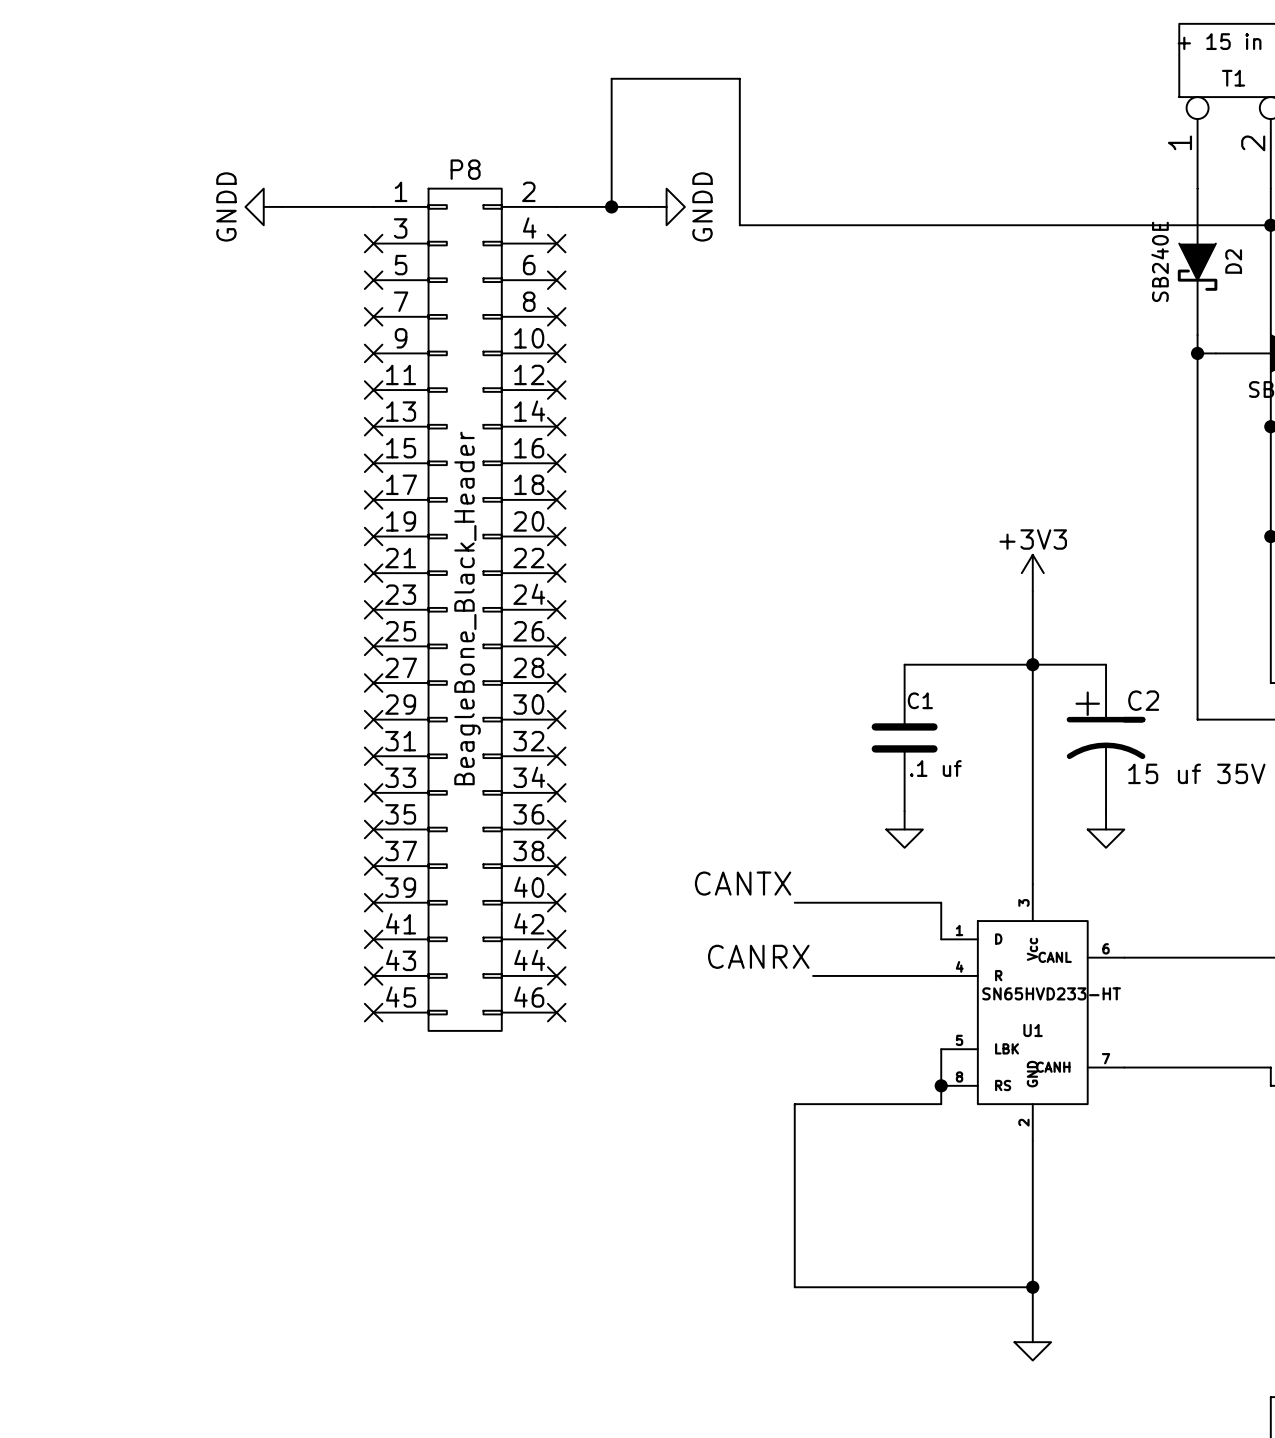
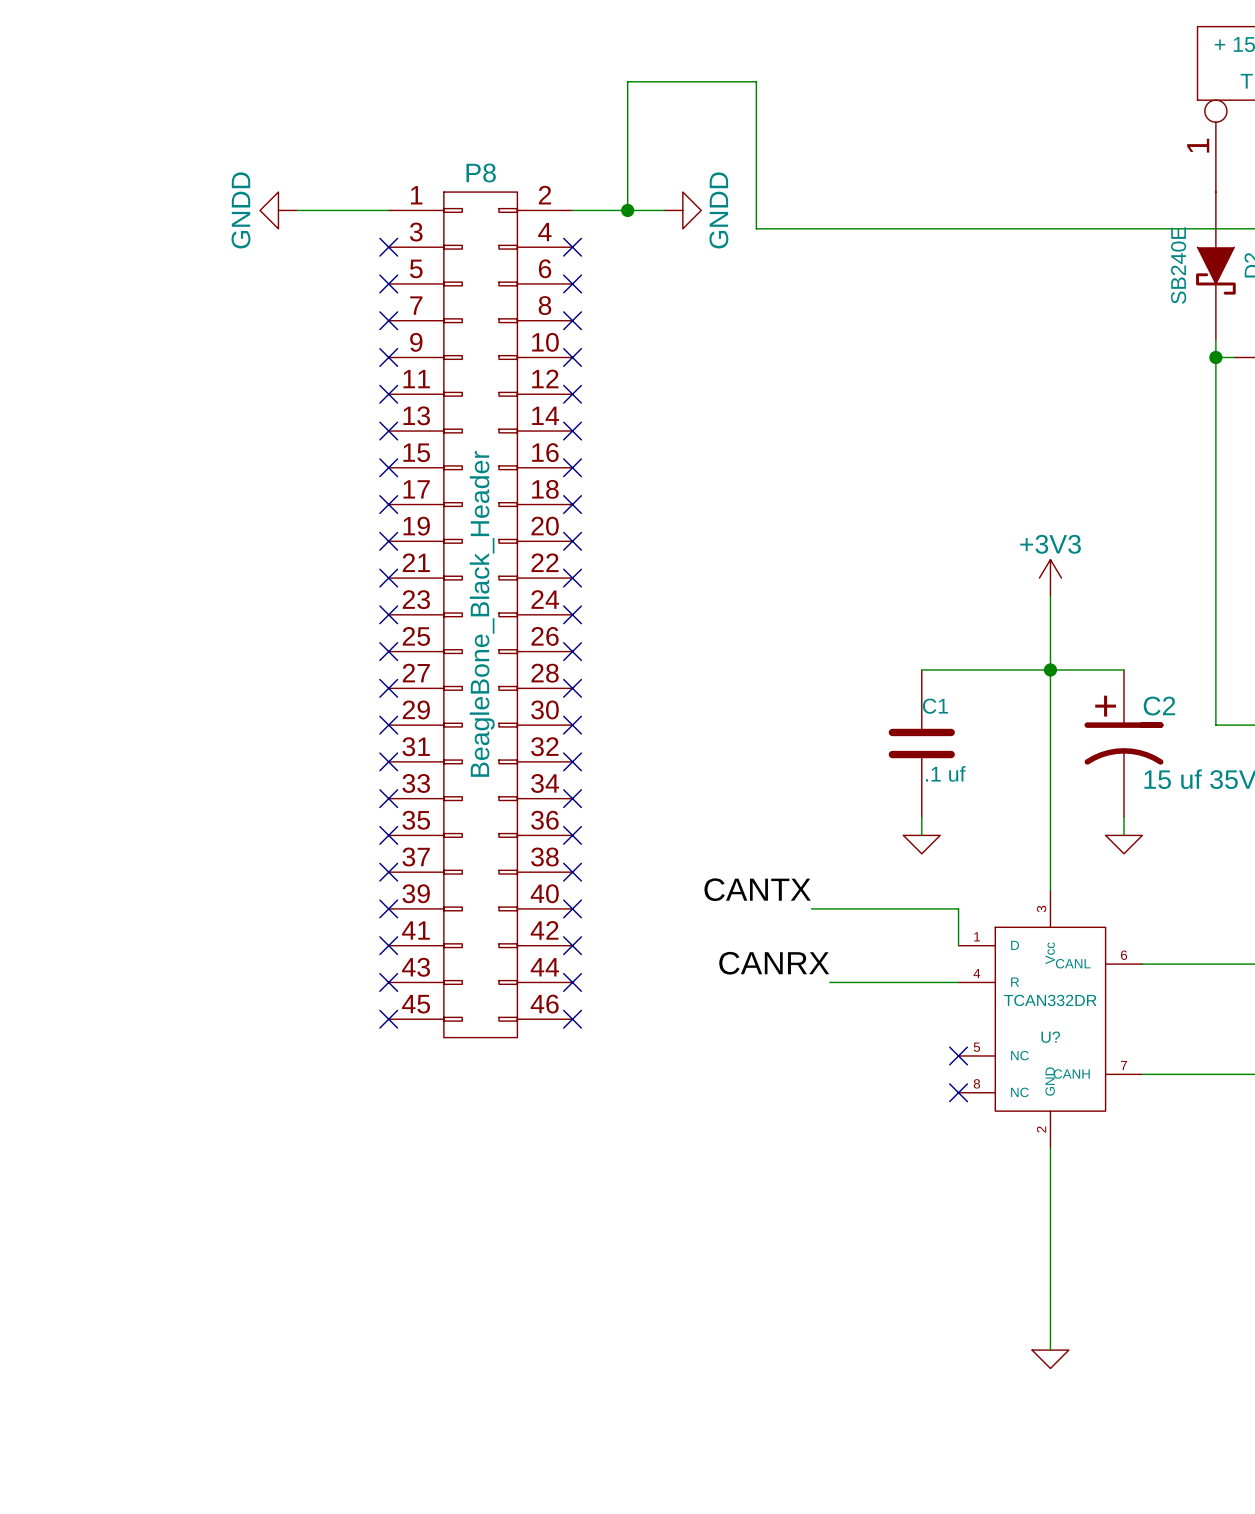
U1 value: SN65HVD233-HT (1051, 993) -> TCAN332DR (1050, 1000)
U1 name: U1 (1033, 1030) -> U? (1050, 1037)
U1 pin name: LBK (1007, 1048) -> NC (1019, 1055)
wire: (941, 1049) (941, 1104) (794, 1104) (794, 1287) (1032, 1287) -> none
no-connect mark: none -> (958, 1055)
junction: (941, 1085) -> none
no-connect mark: none -> (958, 1092)
U1 pin name: RS (1003, 1085) -> NC (1019, 1092)
junction: (1032, 1287) -> none

